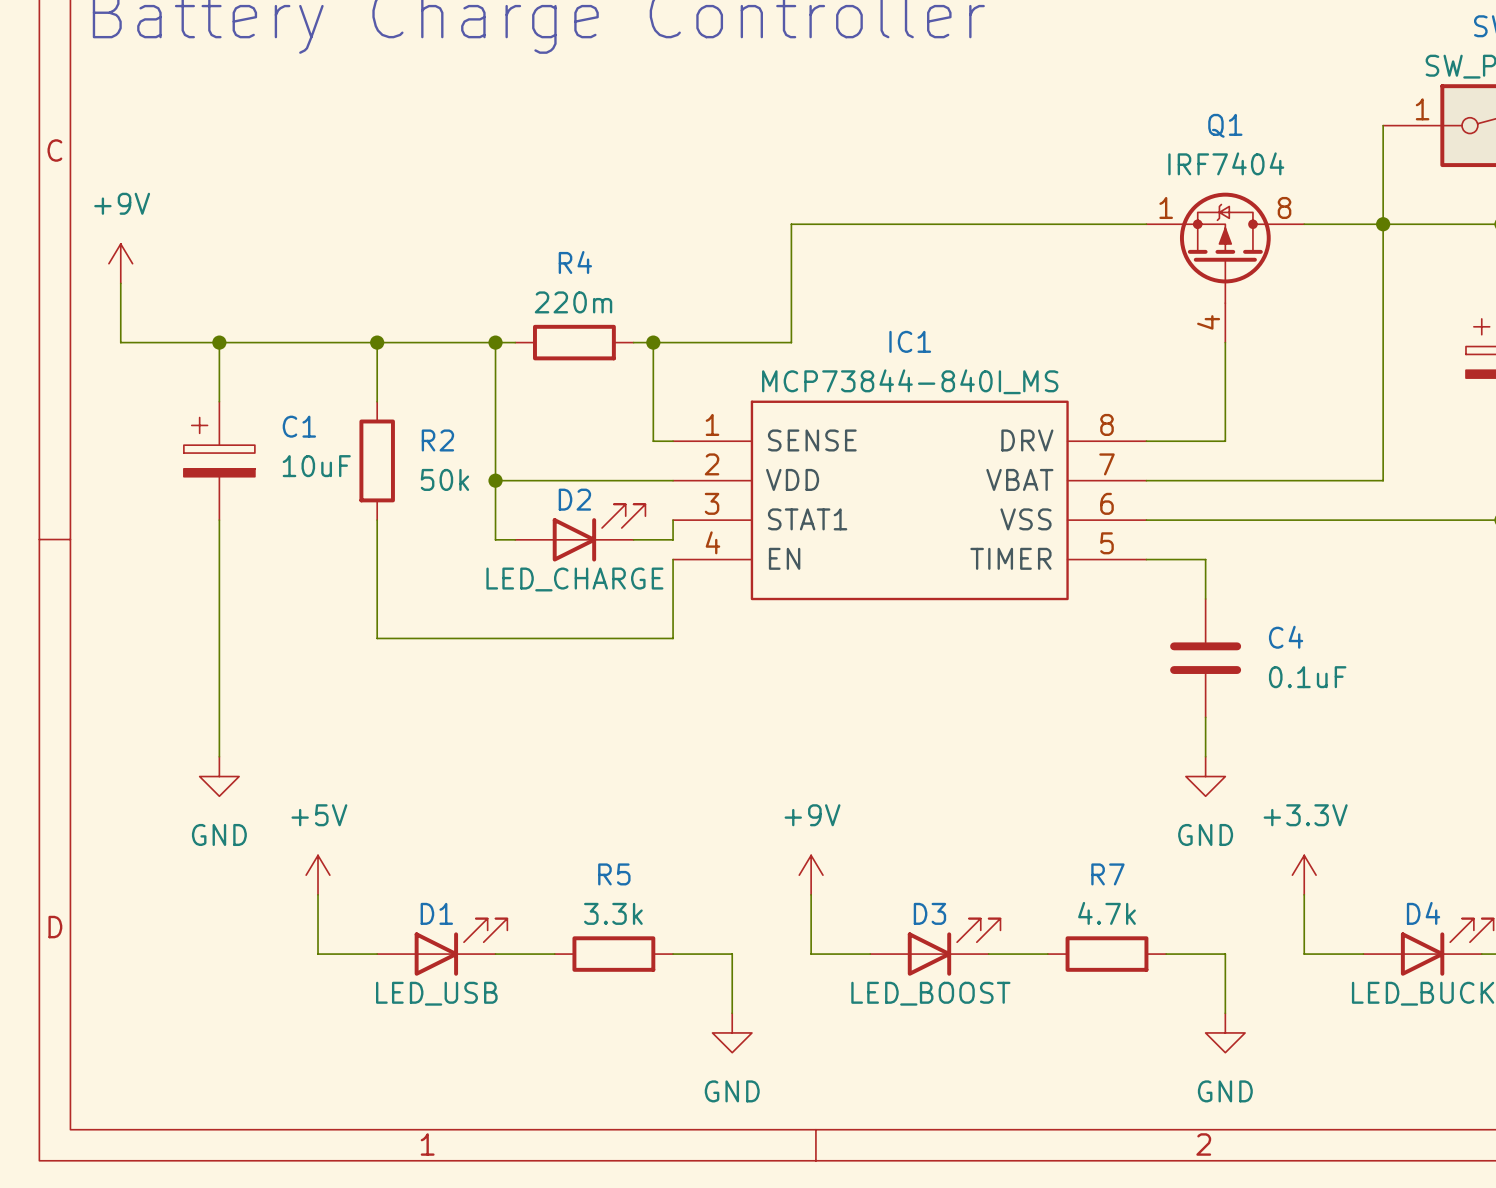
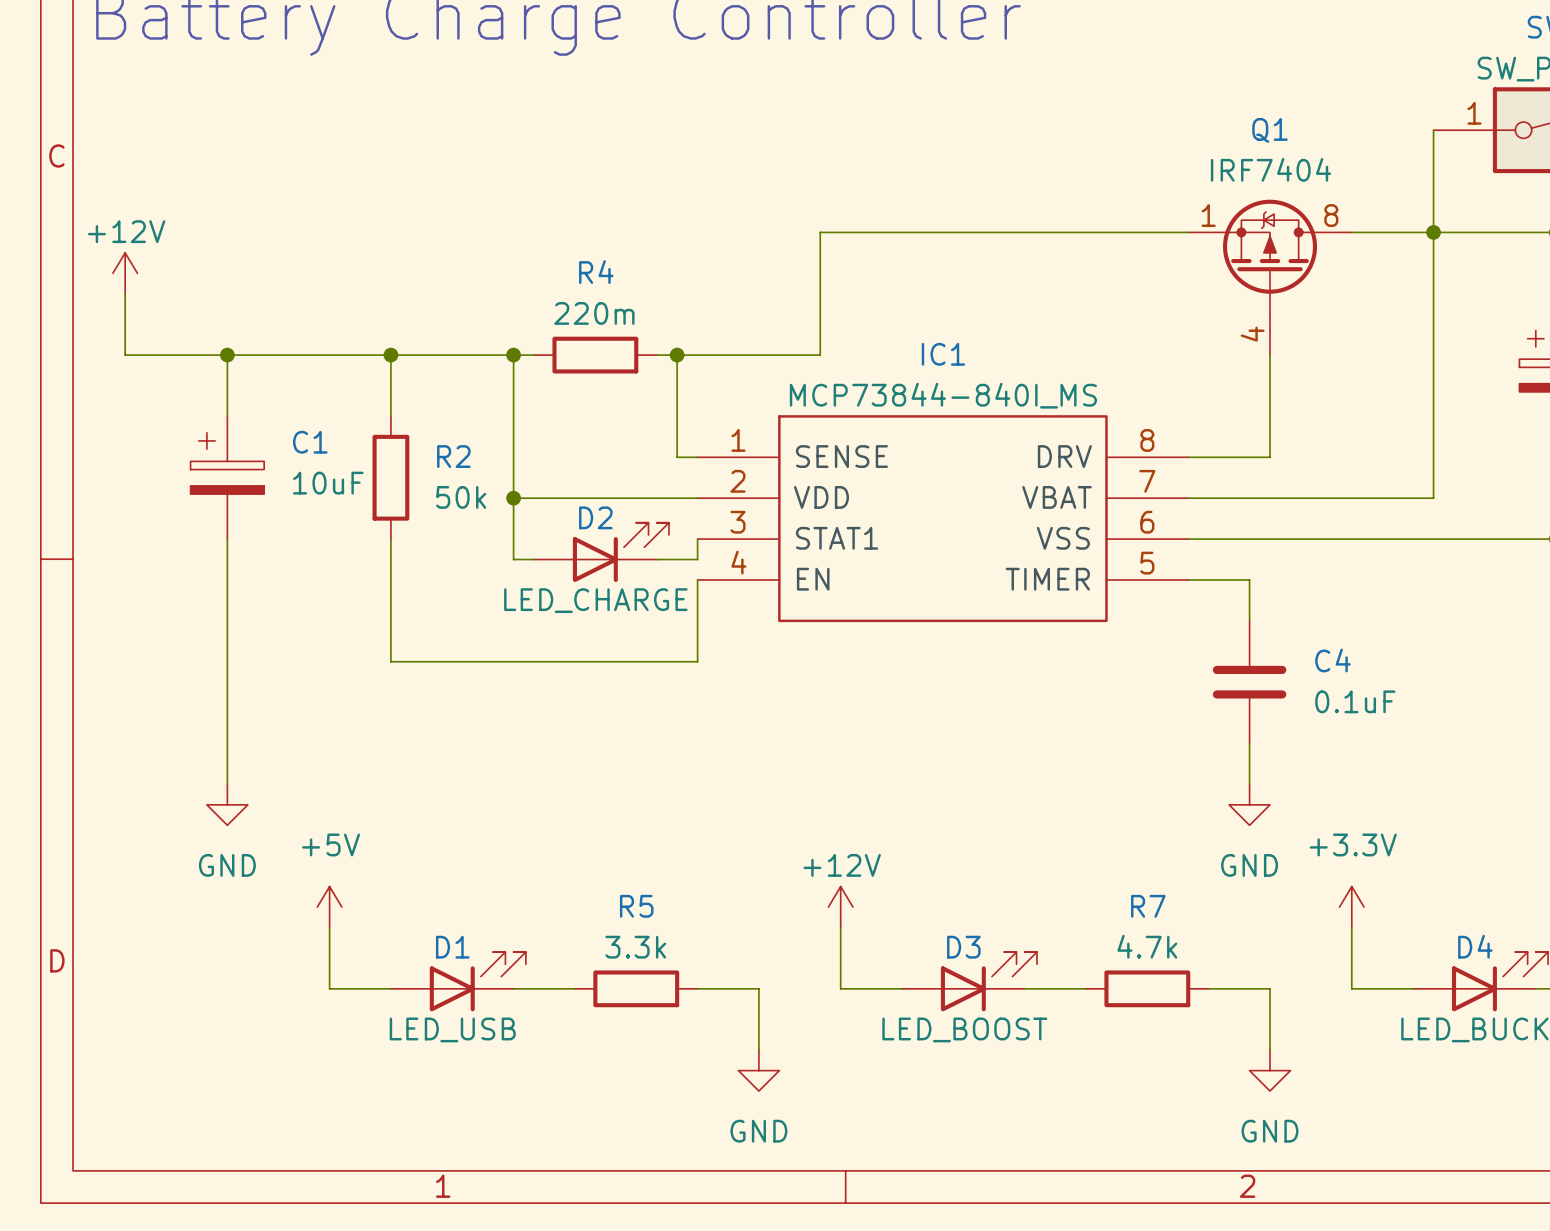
power symbol: +9V (120, 263) -> +12V (125, 273)
power symbol: +9V (811, 875) -> +12V (840, 907)

